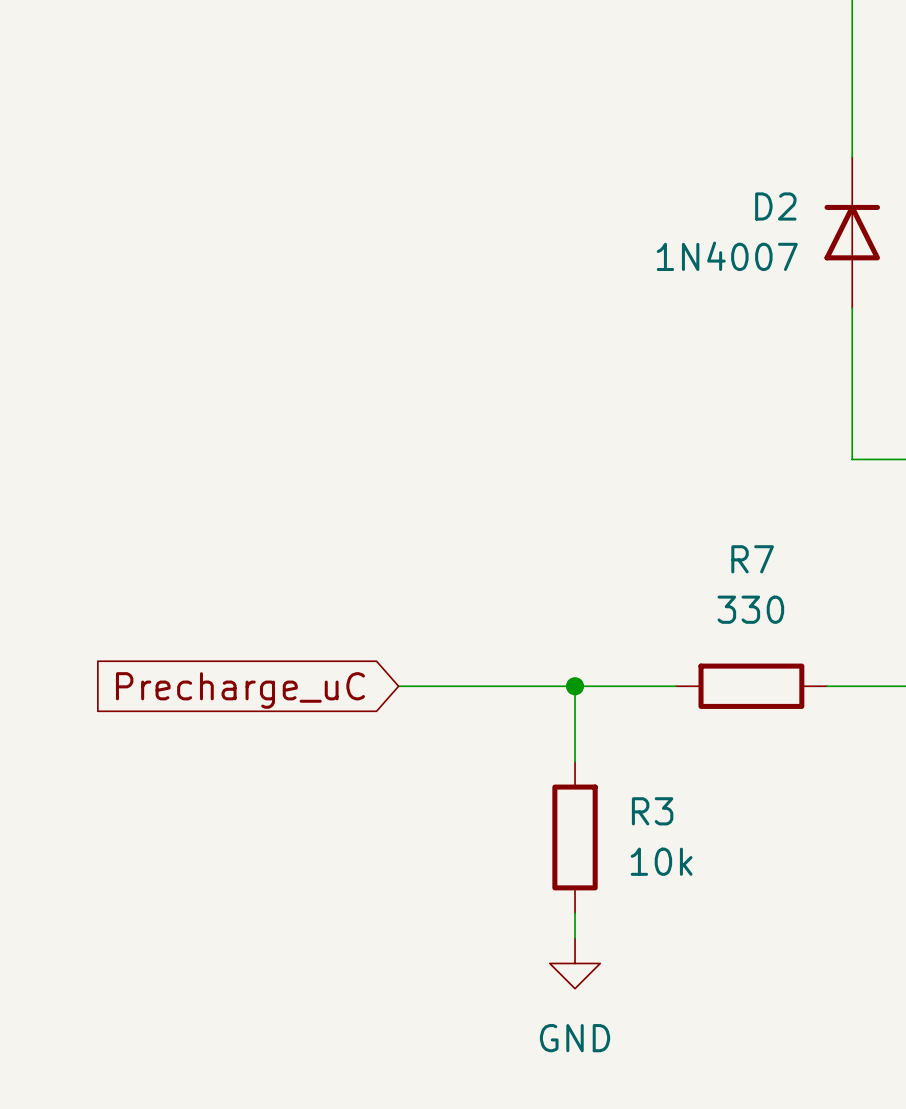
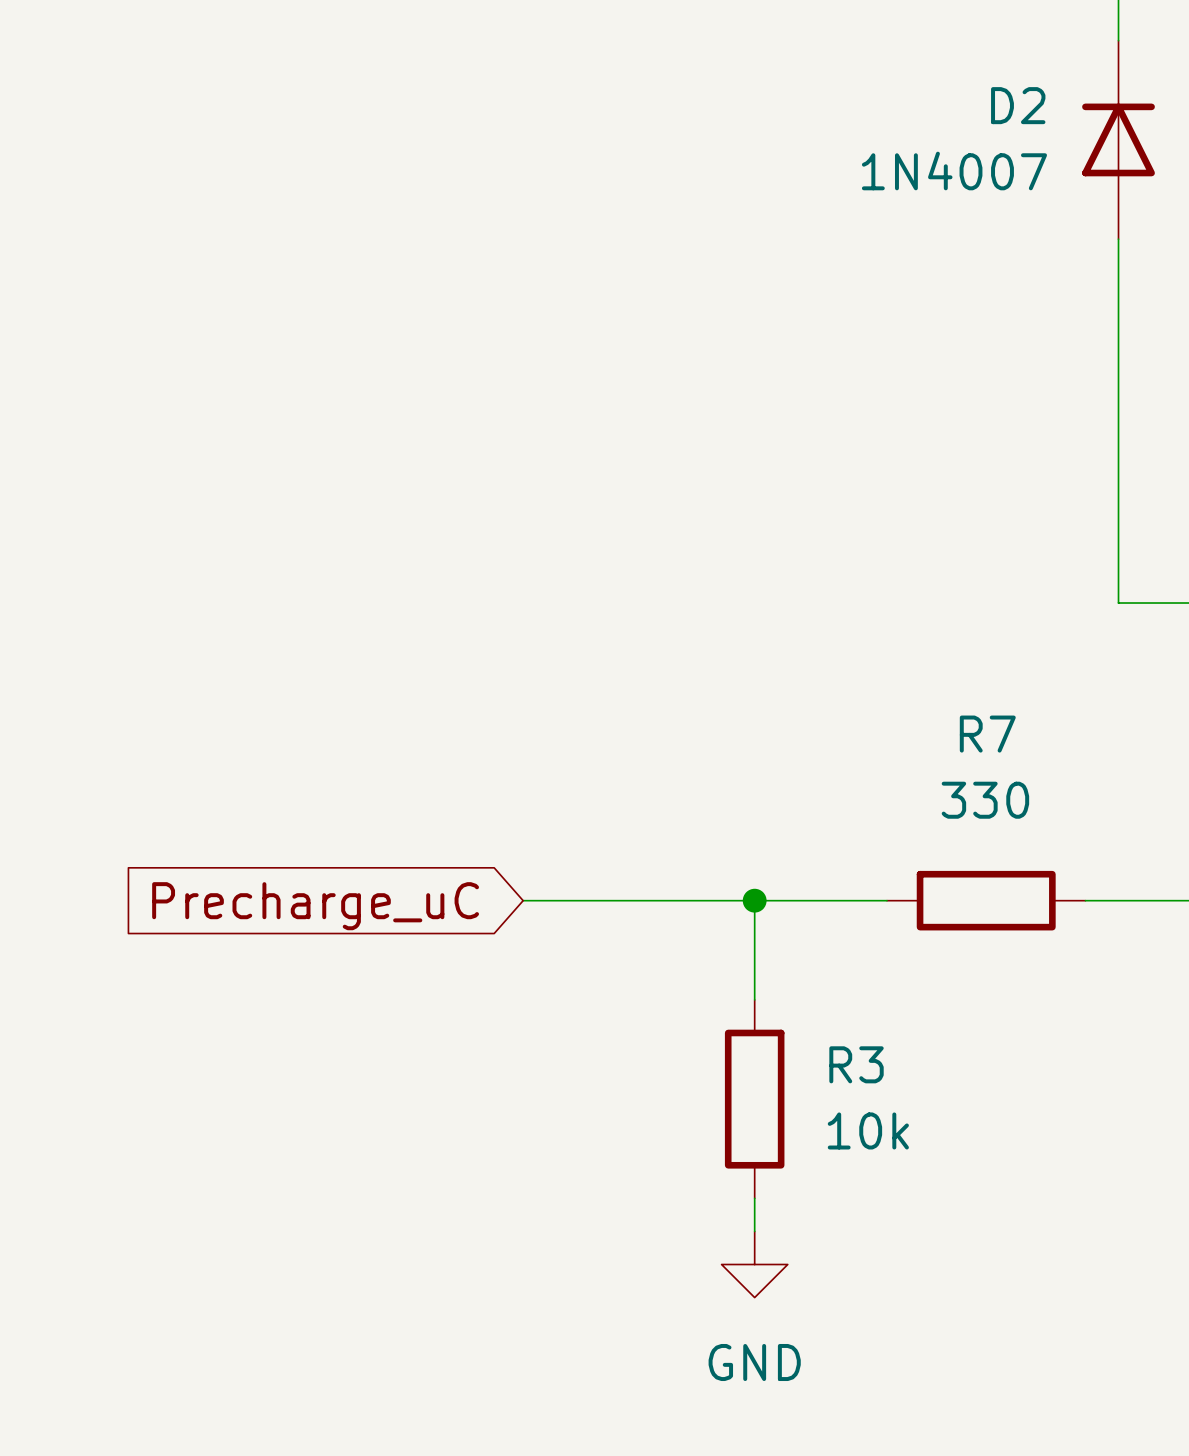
D2 position: (852, 232) -> (1118, 139)

